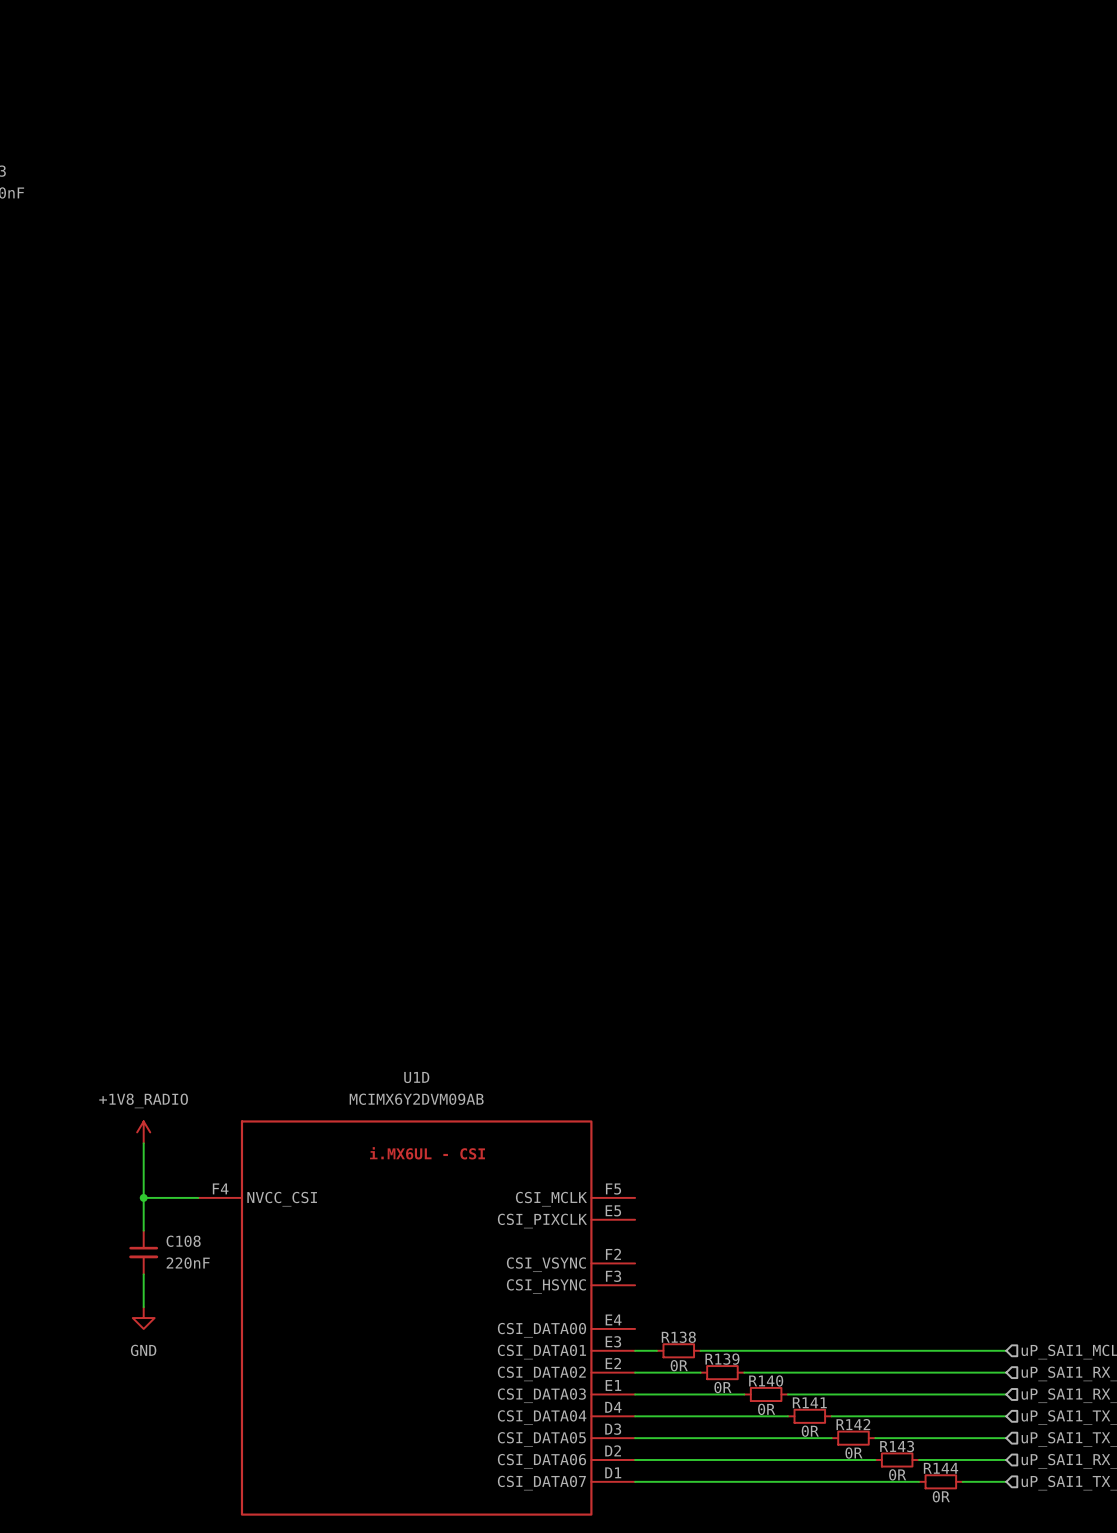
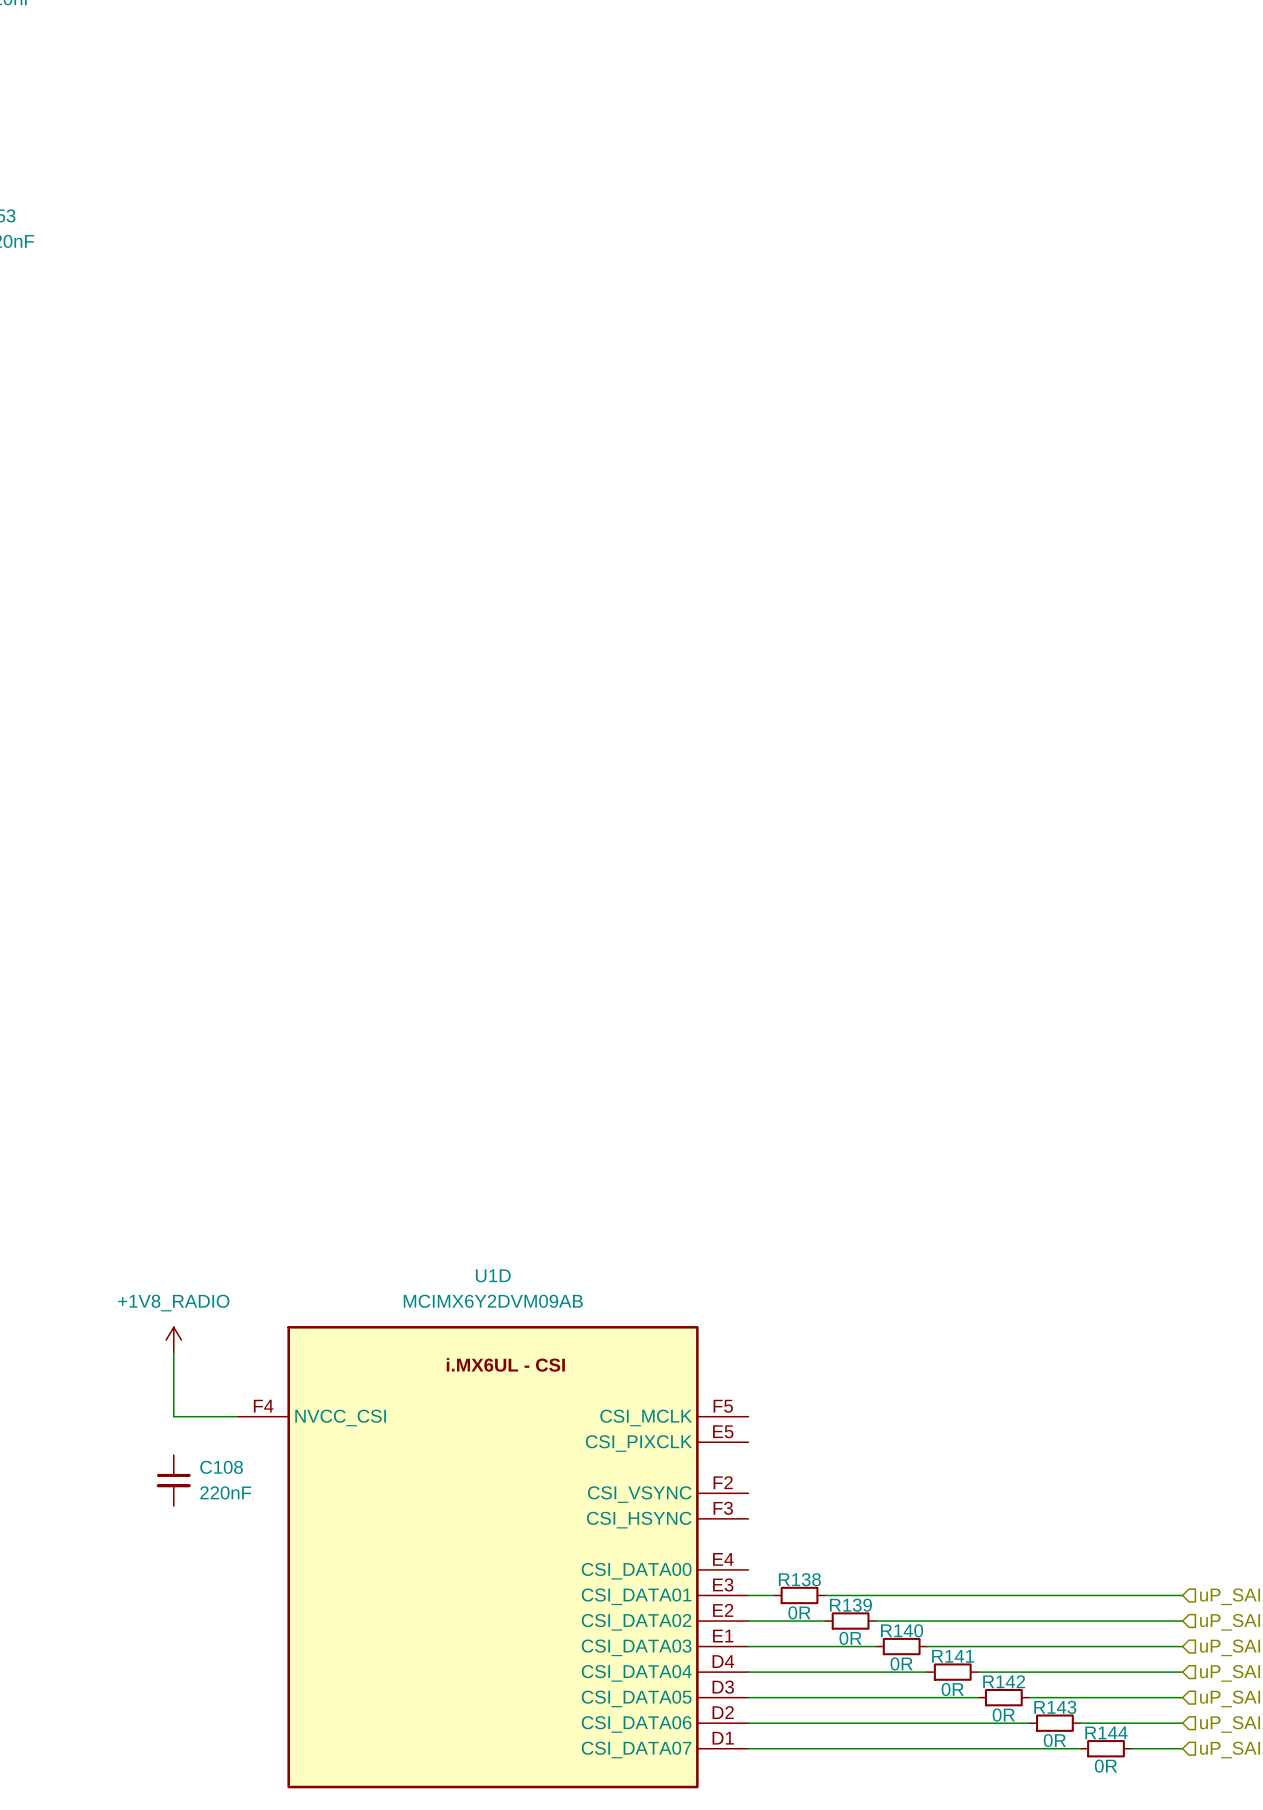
wire: (143, 1197) (143, 1230) -> none
junction: (143, 1197) -> none
wire: (143, 1274) (143, 1307) -> none
power symbol: GND (143, 1318) -> none

